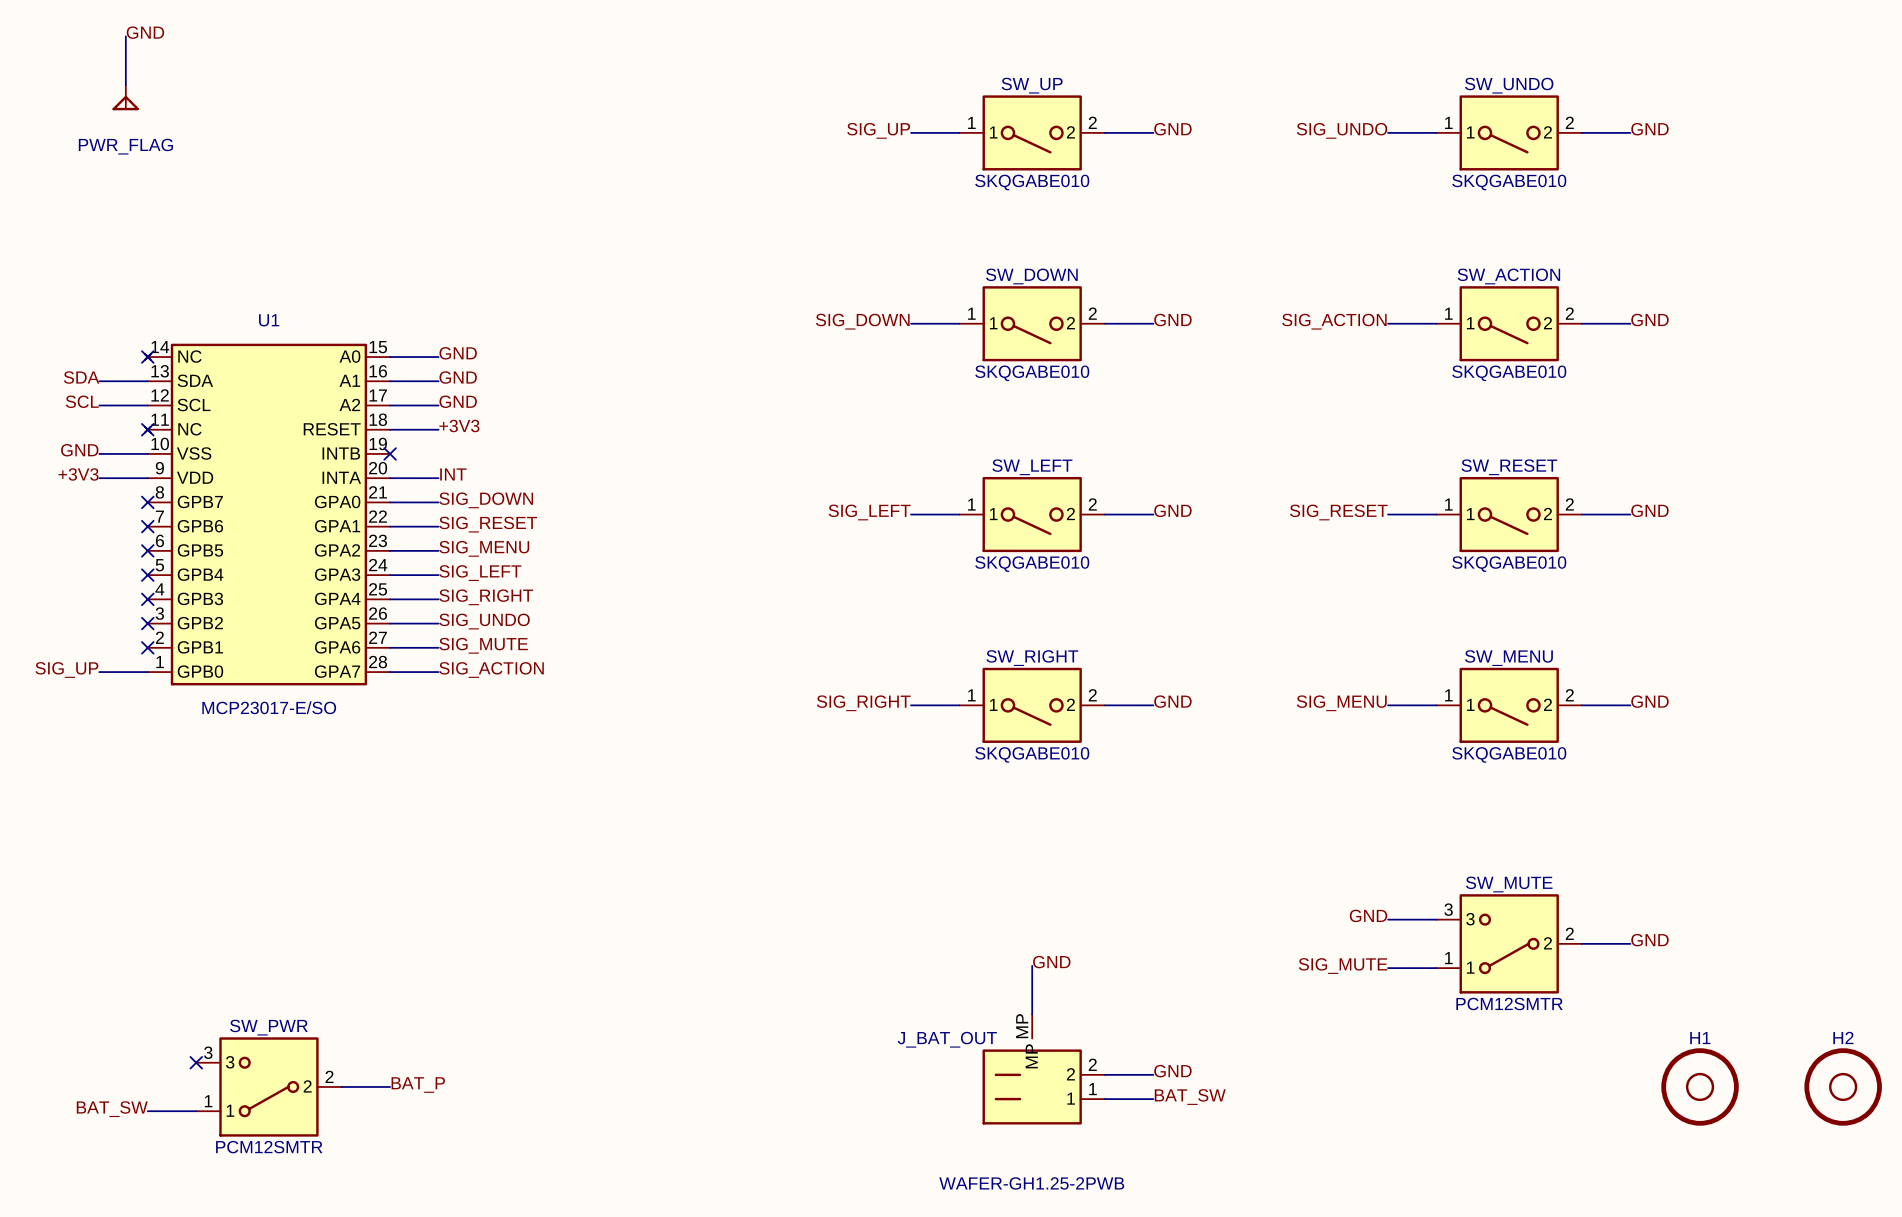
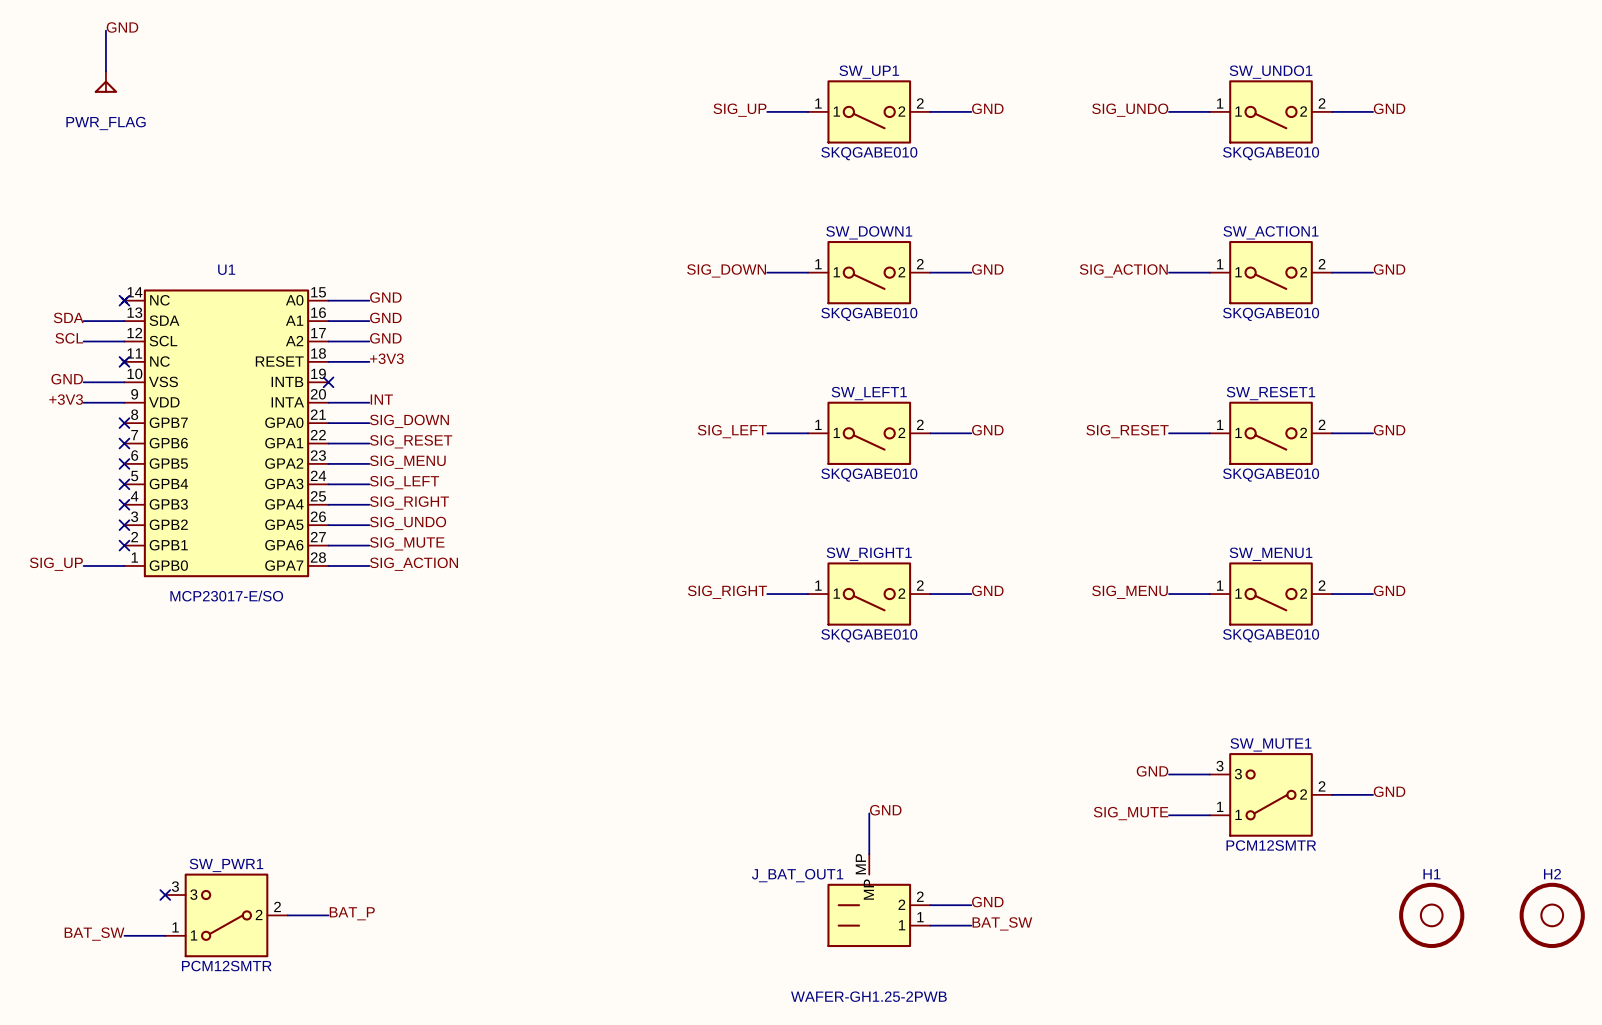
SW_UP name: SW_UP (1032, 85) -> SW_UP1 (869, 72)
SW_UNDO name: SW_UNDO (1509, 85) -> SW_UNDO1 (1270, 72)
SW_DOWN name: SW_DOWN (1031, 276) -> SW_DOWN1 (869, 232)
SW_ACTION name: SW_ACTION (1508, 276) -> SW_ACTION1 (1270, 232)
SW_LEFT name: SW_LEFT (1032, 467) -> SW_LEFT1 (869, 393)
SW_RESET name: SW_RESET (1509, 467) -> SW_RESET1 (1270, 393)
SW_RIGHT name: SW_RIGHT (1032, 658) -> SW_RIGHT1 (869, 554)
SW_MENU name: SW_MENU (1508, 658) -> SW_MENU1 (1270, 554)
SW_MUTE name: SW_MUTE (1509, 884) -> SW_MUTE1 (1270, 744)
SW_PWR name: SW_PWR (268, 1027) -> SW_PWR1 (226, 865)
J_BAT_OUT name: J_BAT_OUT (947, 1039) -> J_BAT_OUT1 (797, 875)

